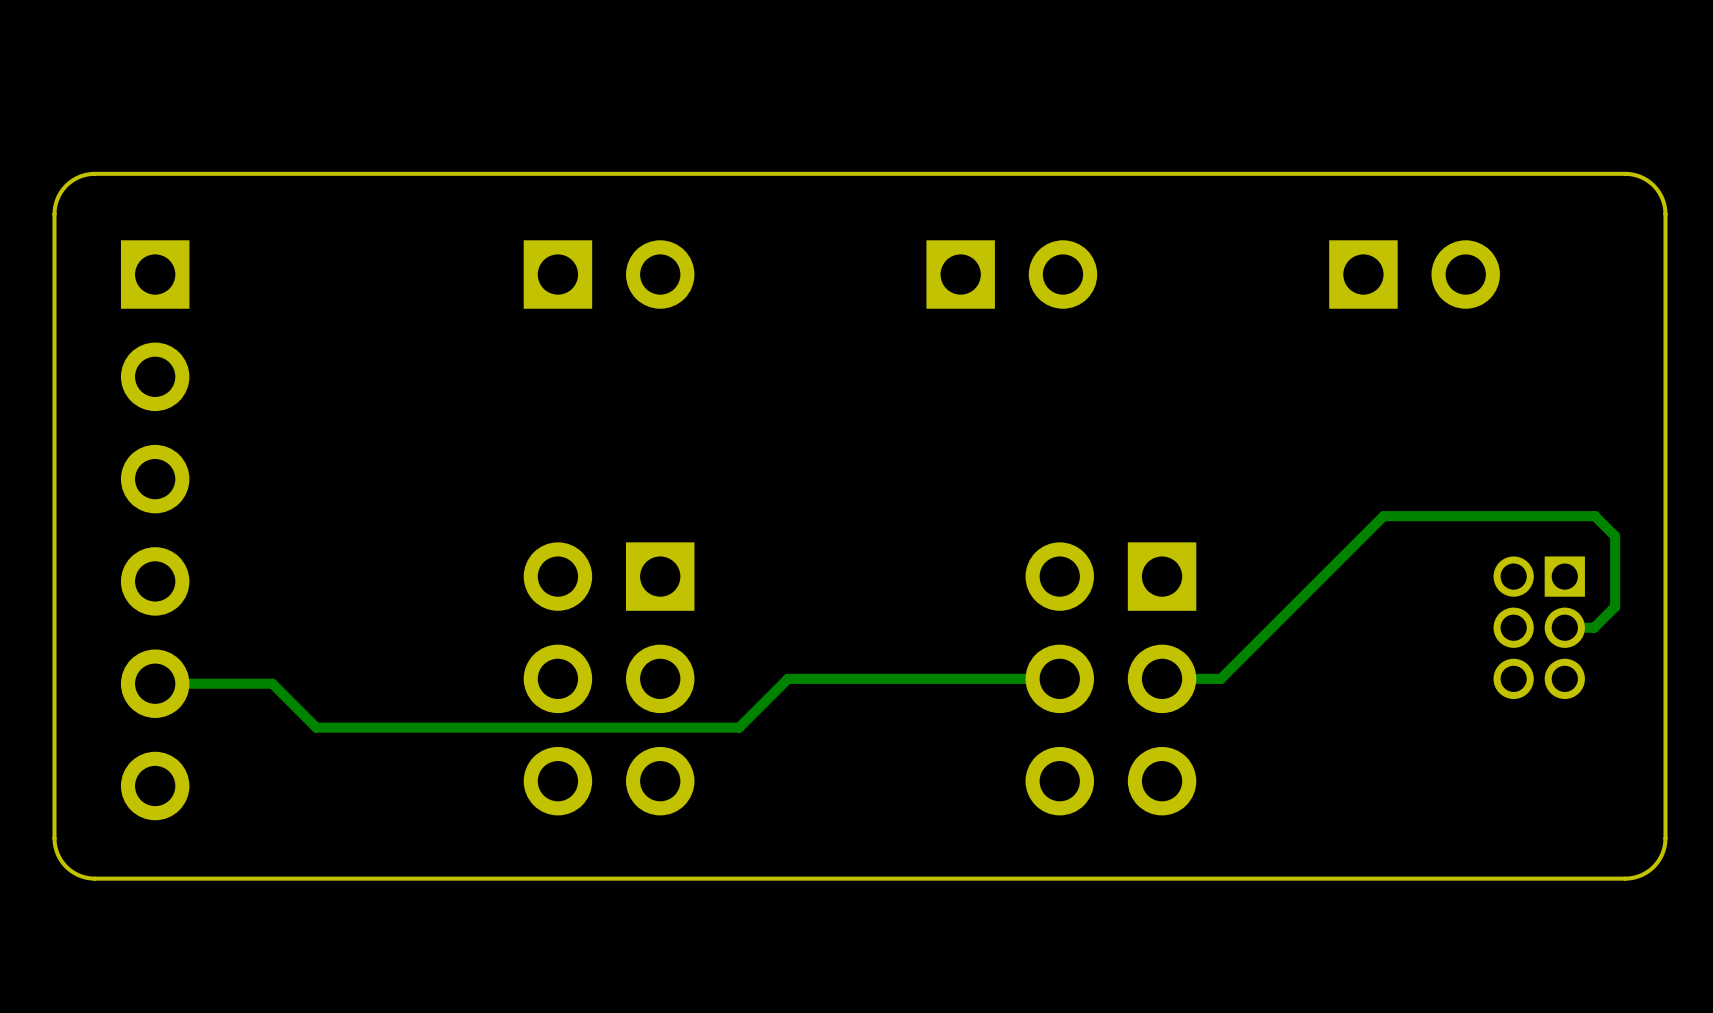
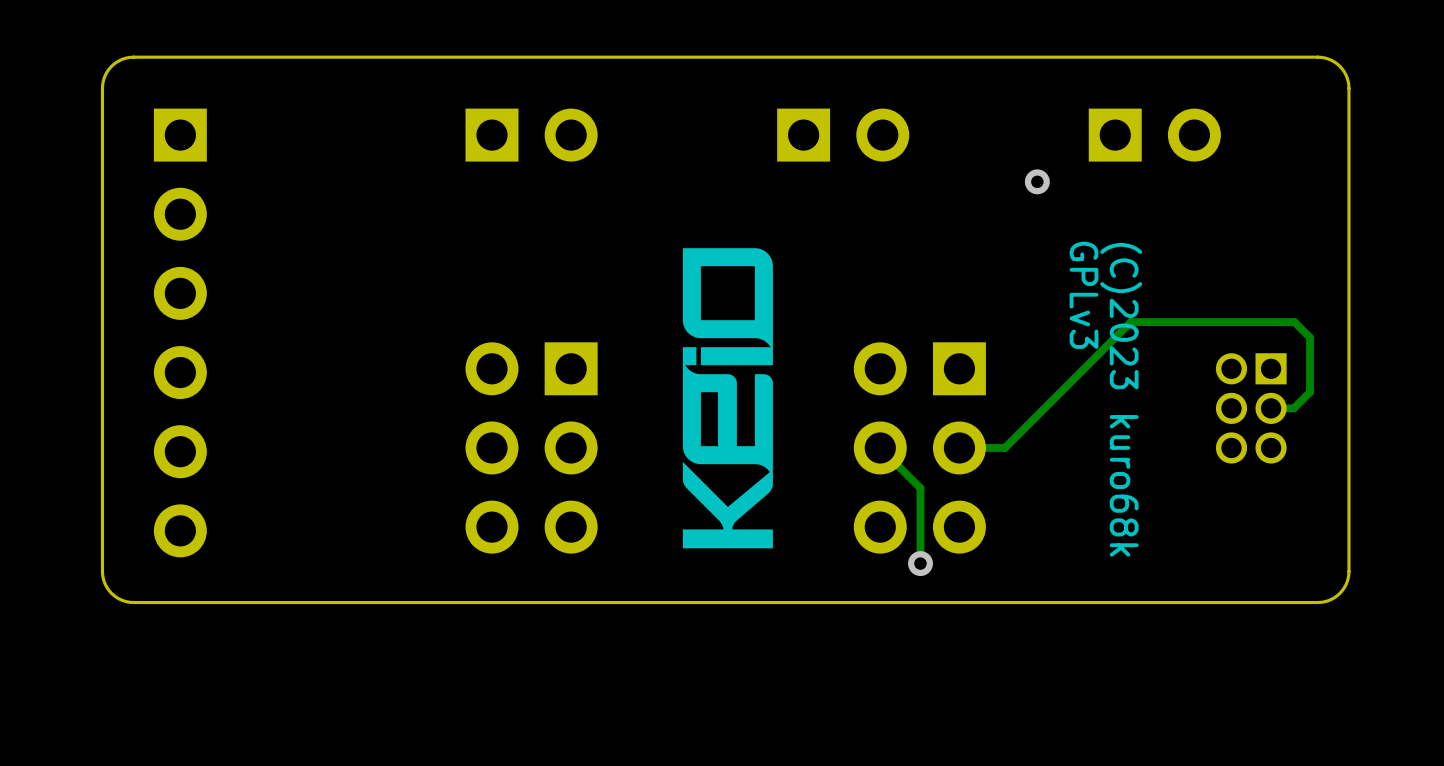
via: none -> (1037, 181)
drawing: none -> [682, 248, 773, 549]
text: none -> GPLv3 (1084, 295)
text: none -> (C)2023 kuro68k (1121, 399)
track: (1059, 678) (787, 678) (739, 727) (316, 727) (272, 683) (155, 683) -> (880, 447) (920, 488) (920, 563)
via: none -> (920, 563)

